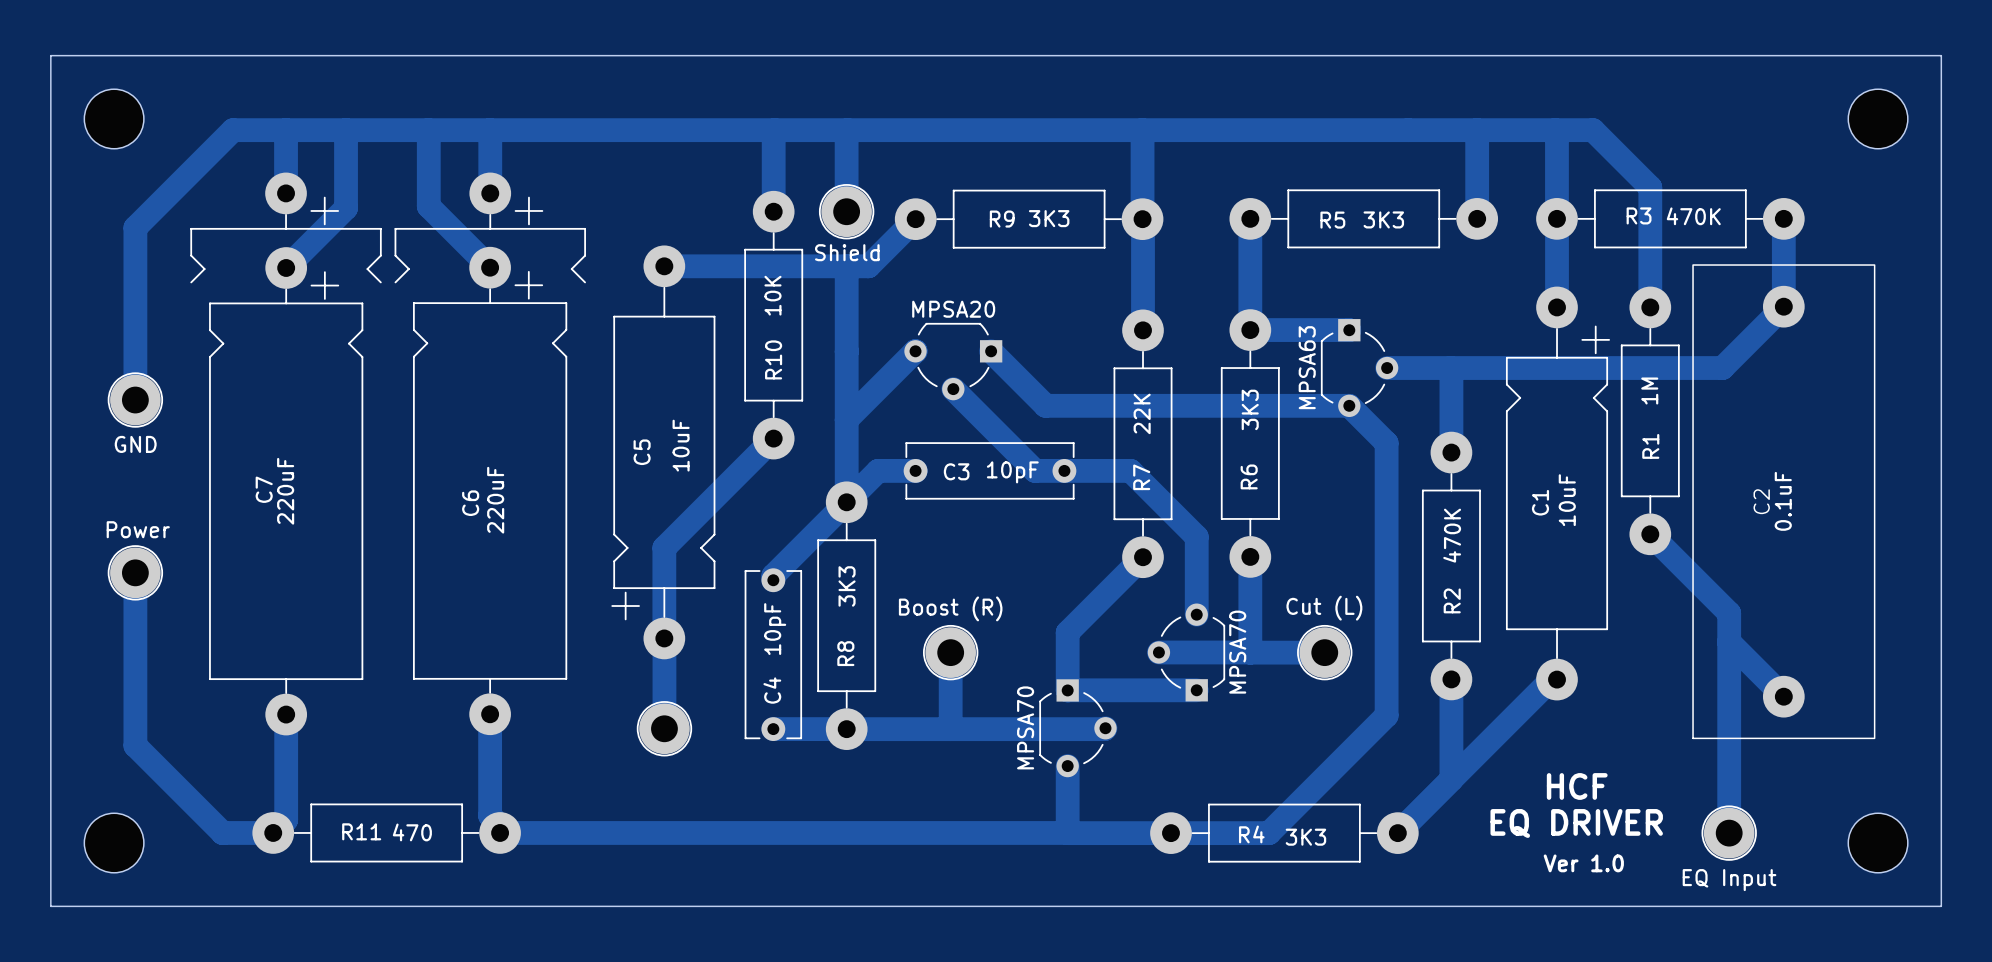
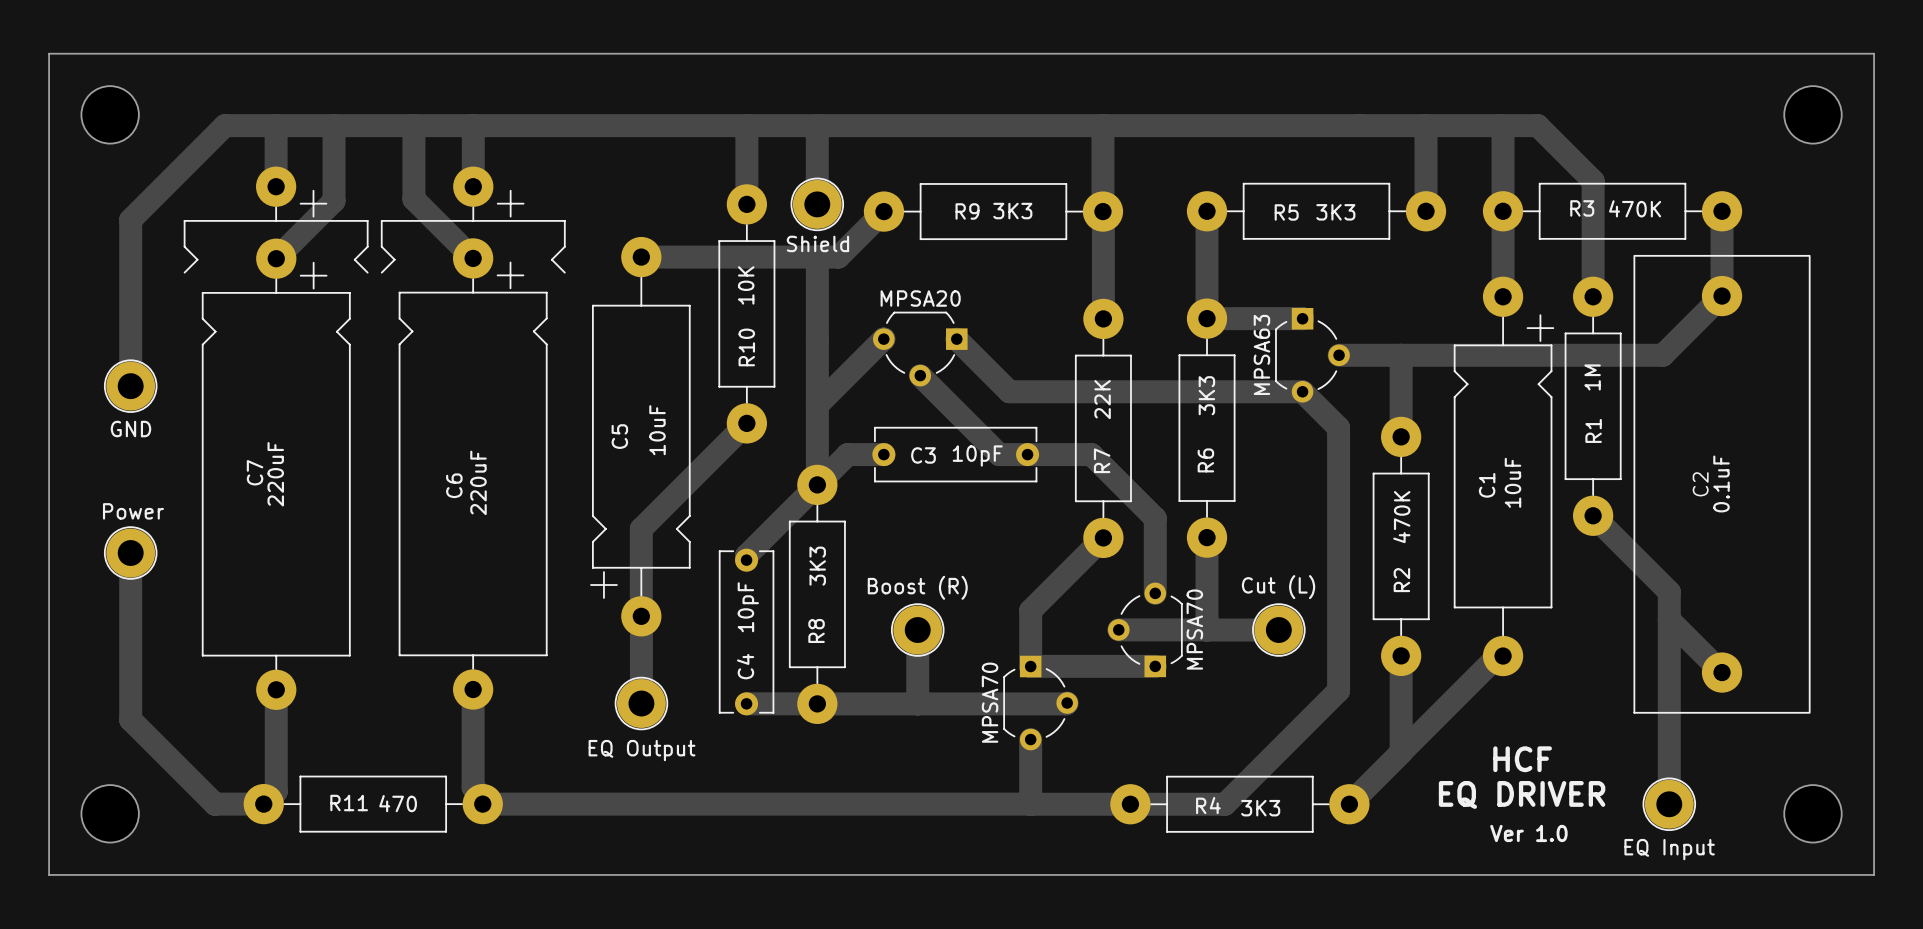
part value: none -> EQ Output (642, 750)

